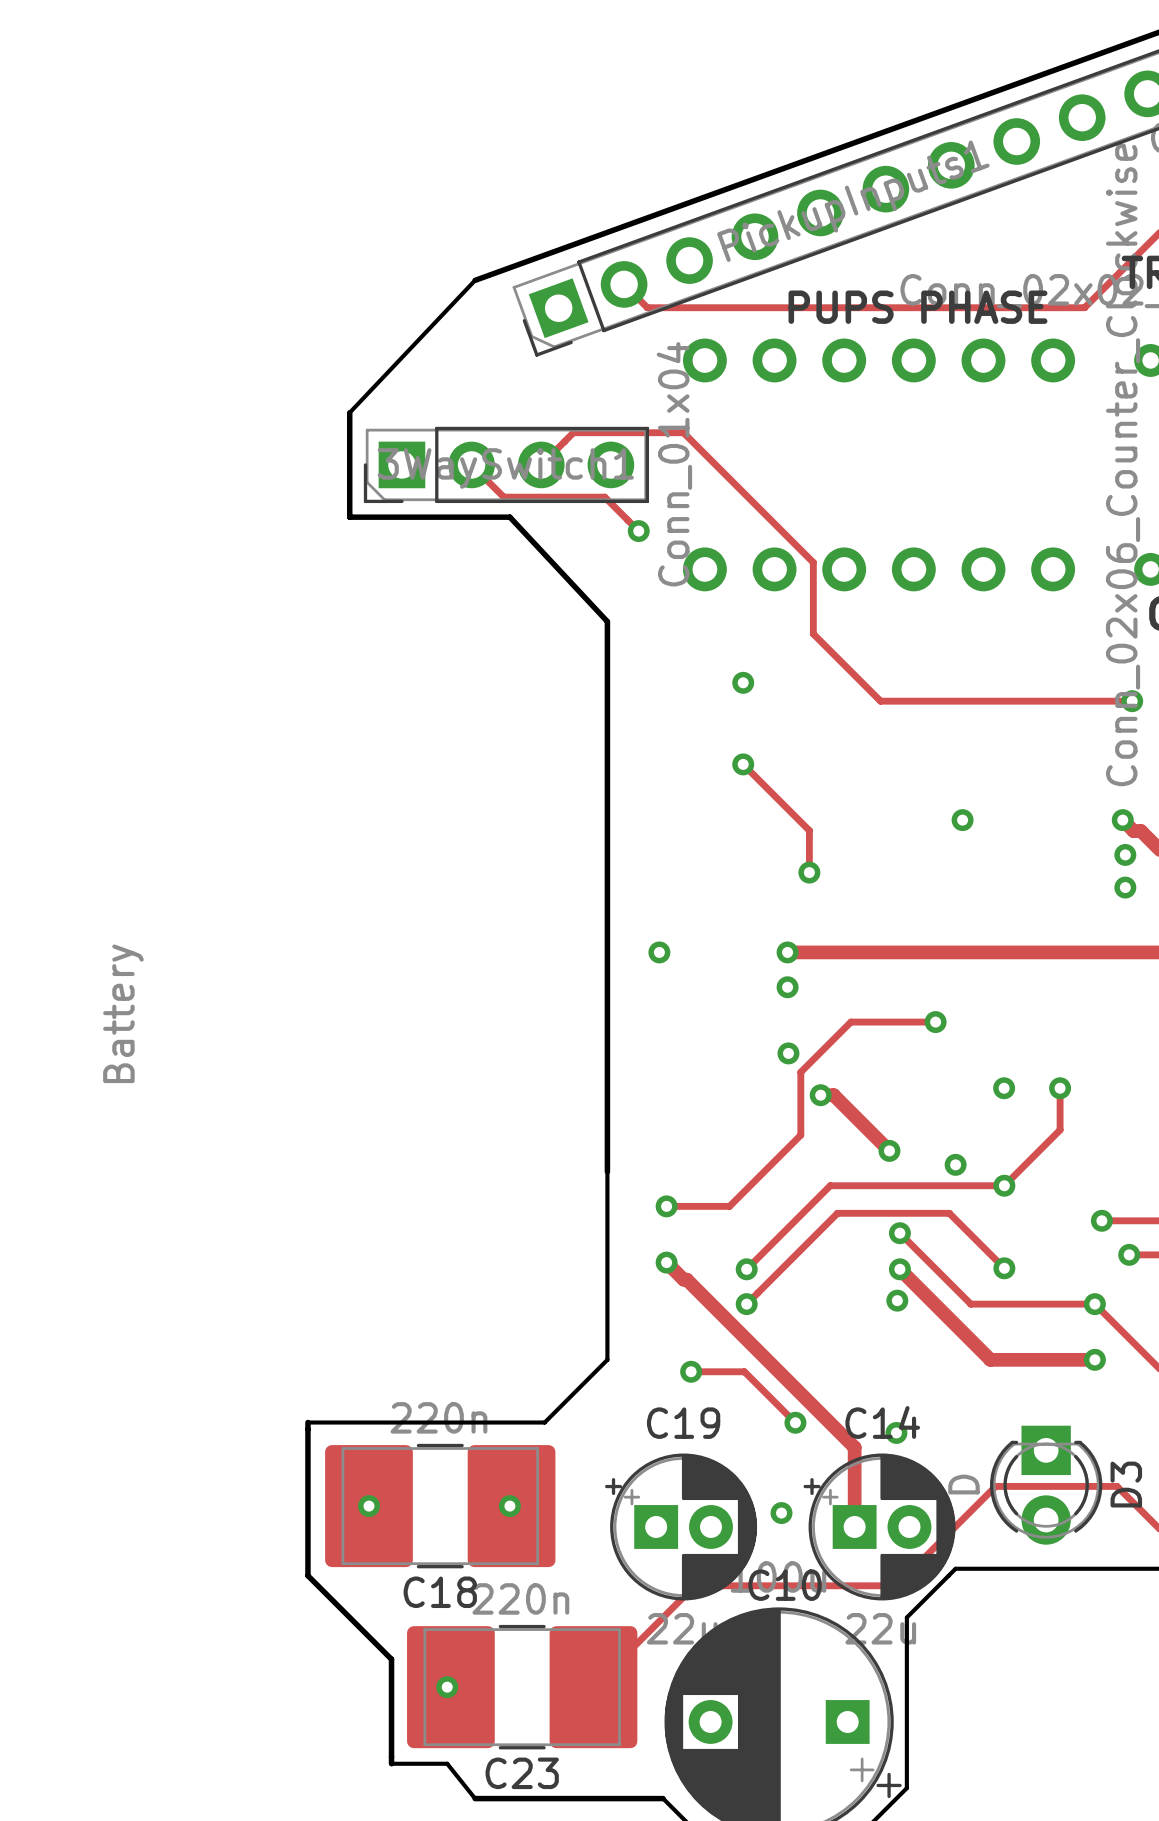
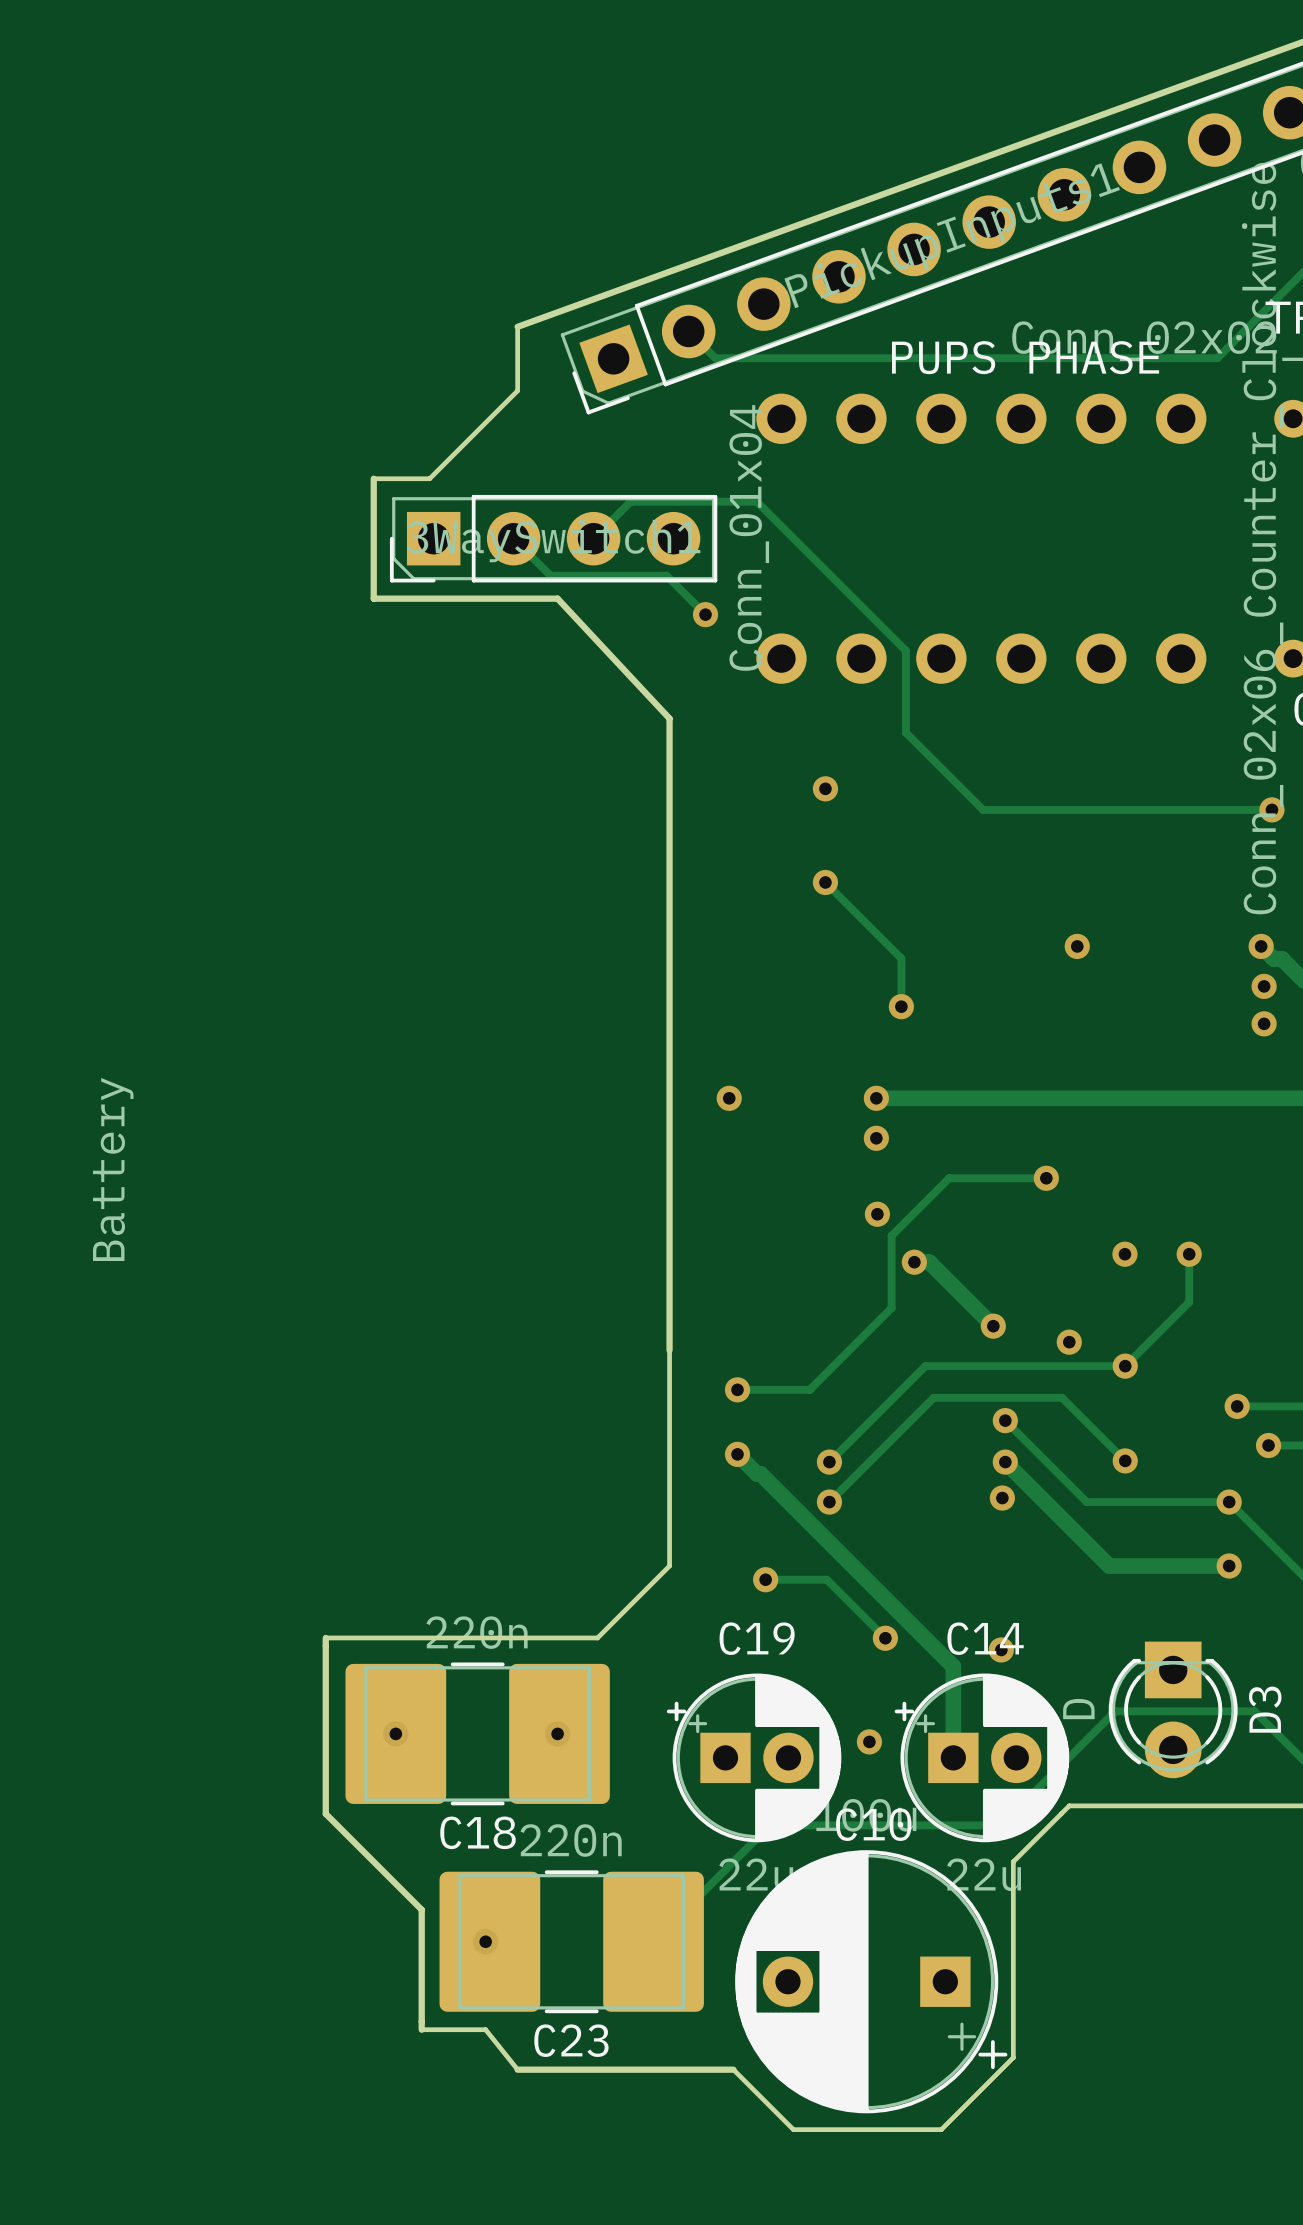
board edge: (475, 280) (349, 412) -> (517, 326) (517, 390) (429, 478) (373, 478)

